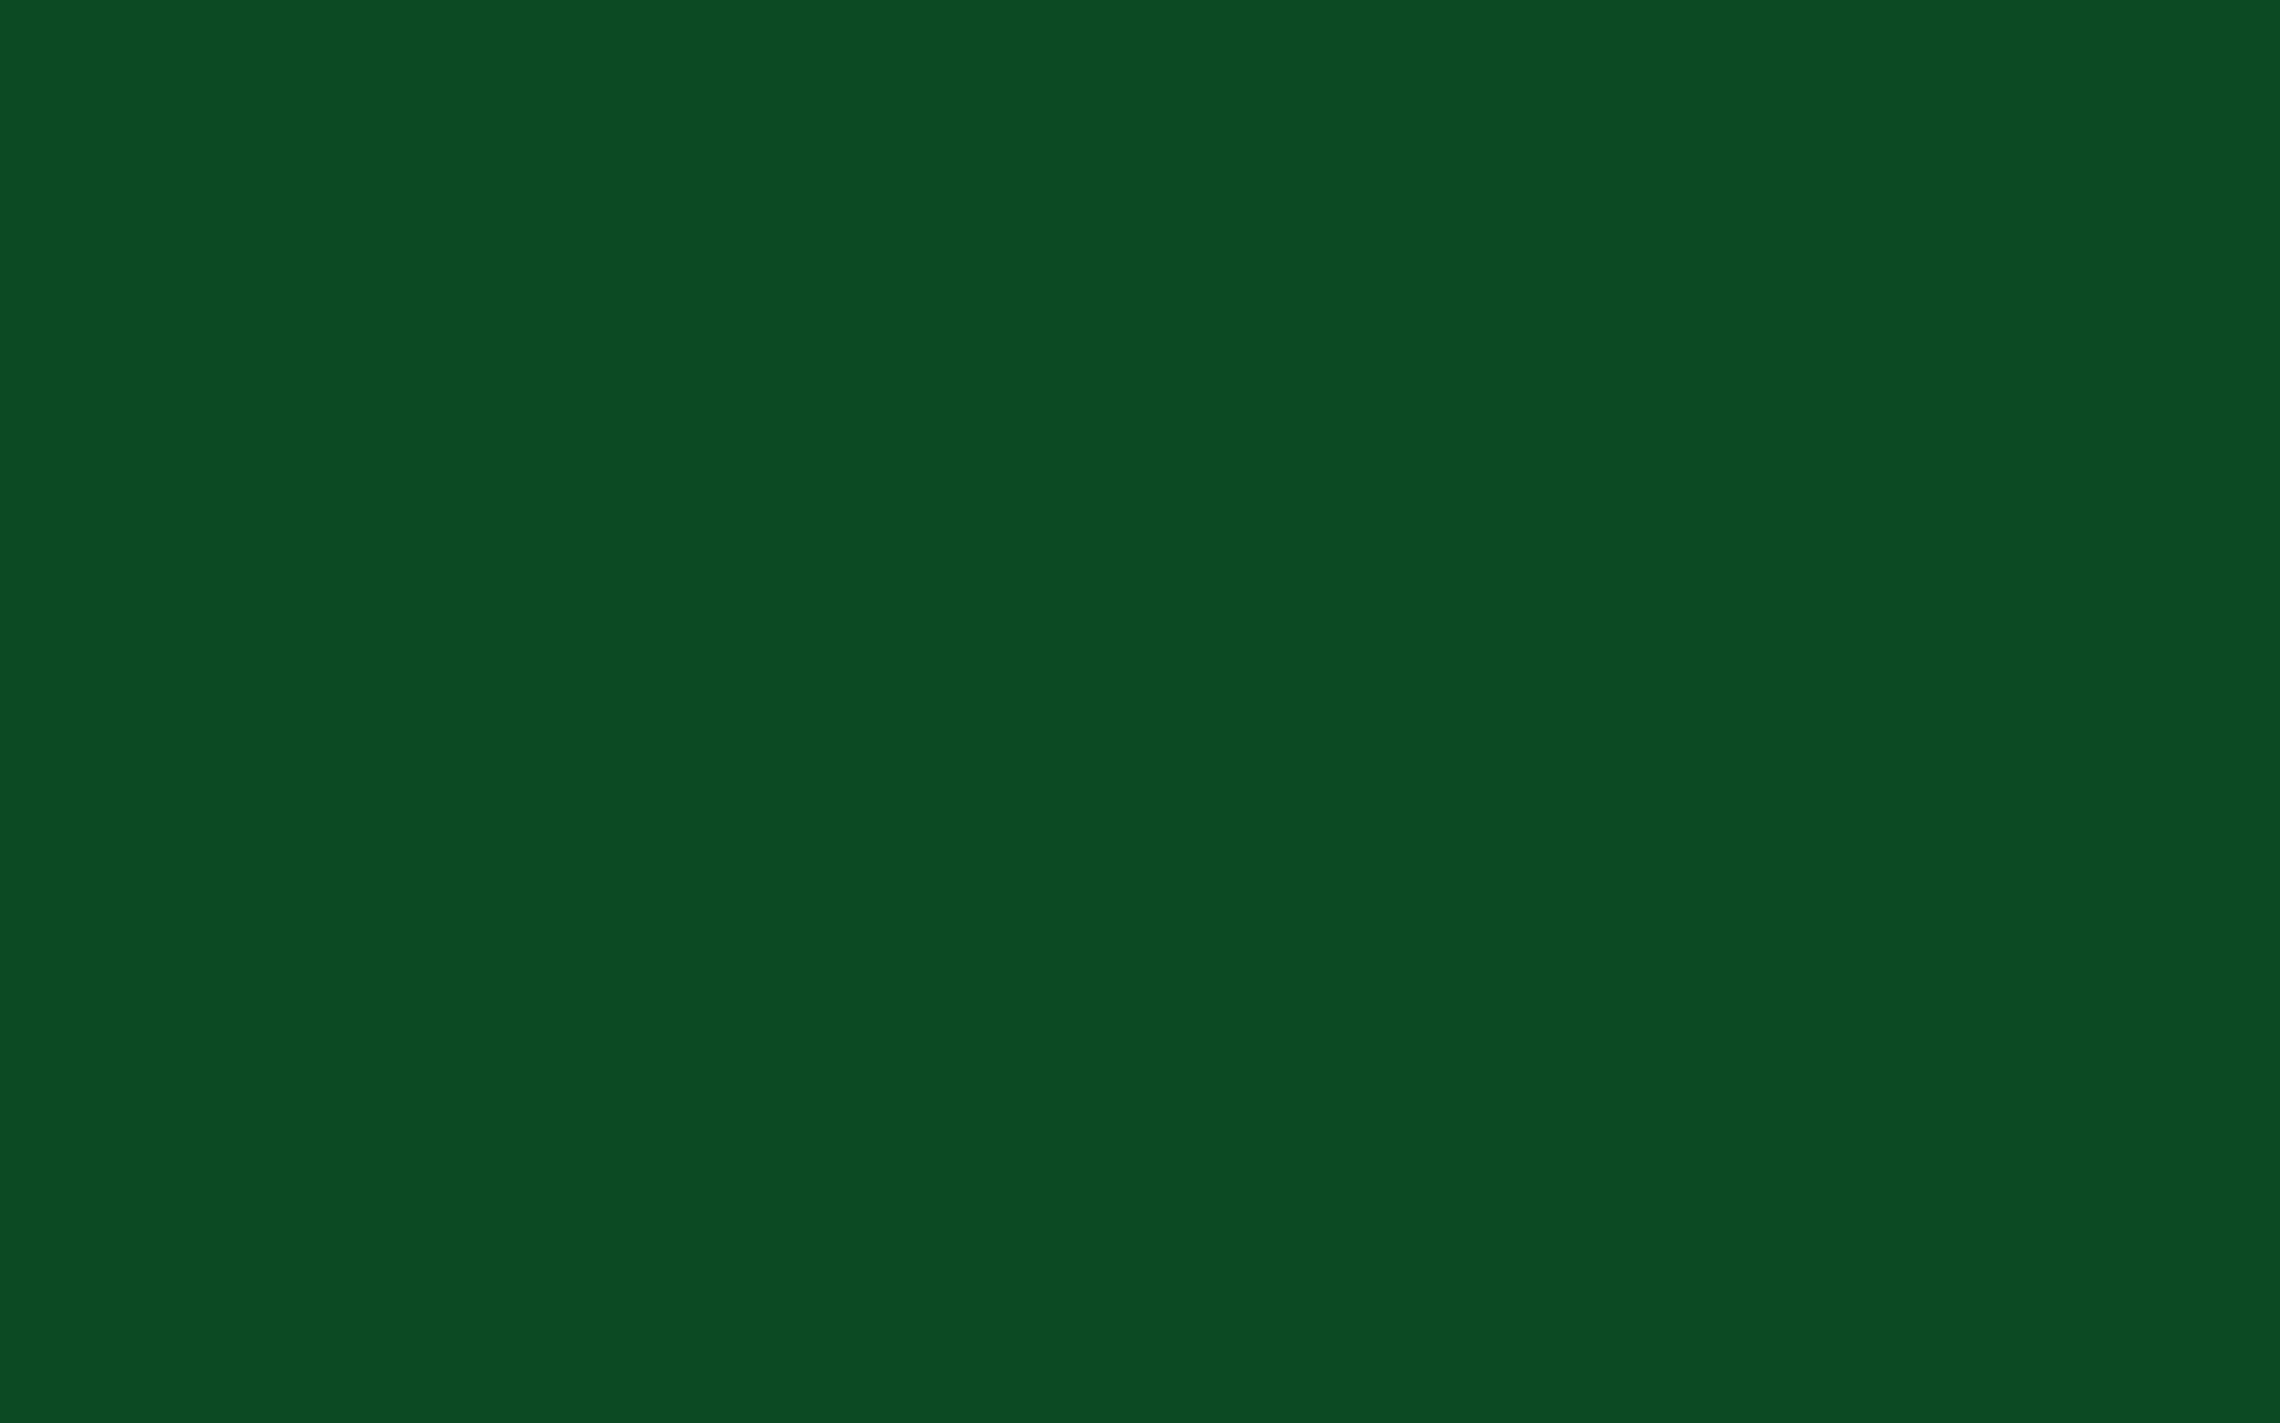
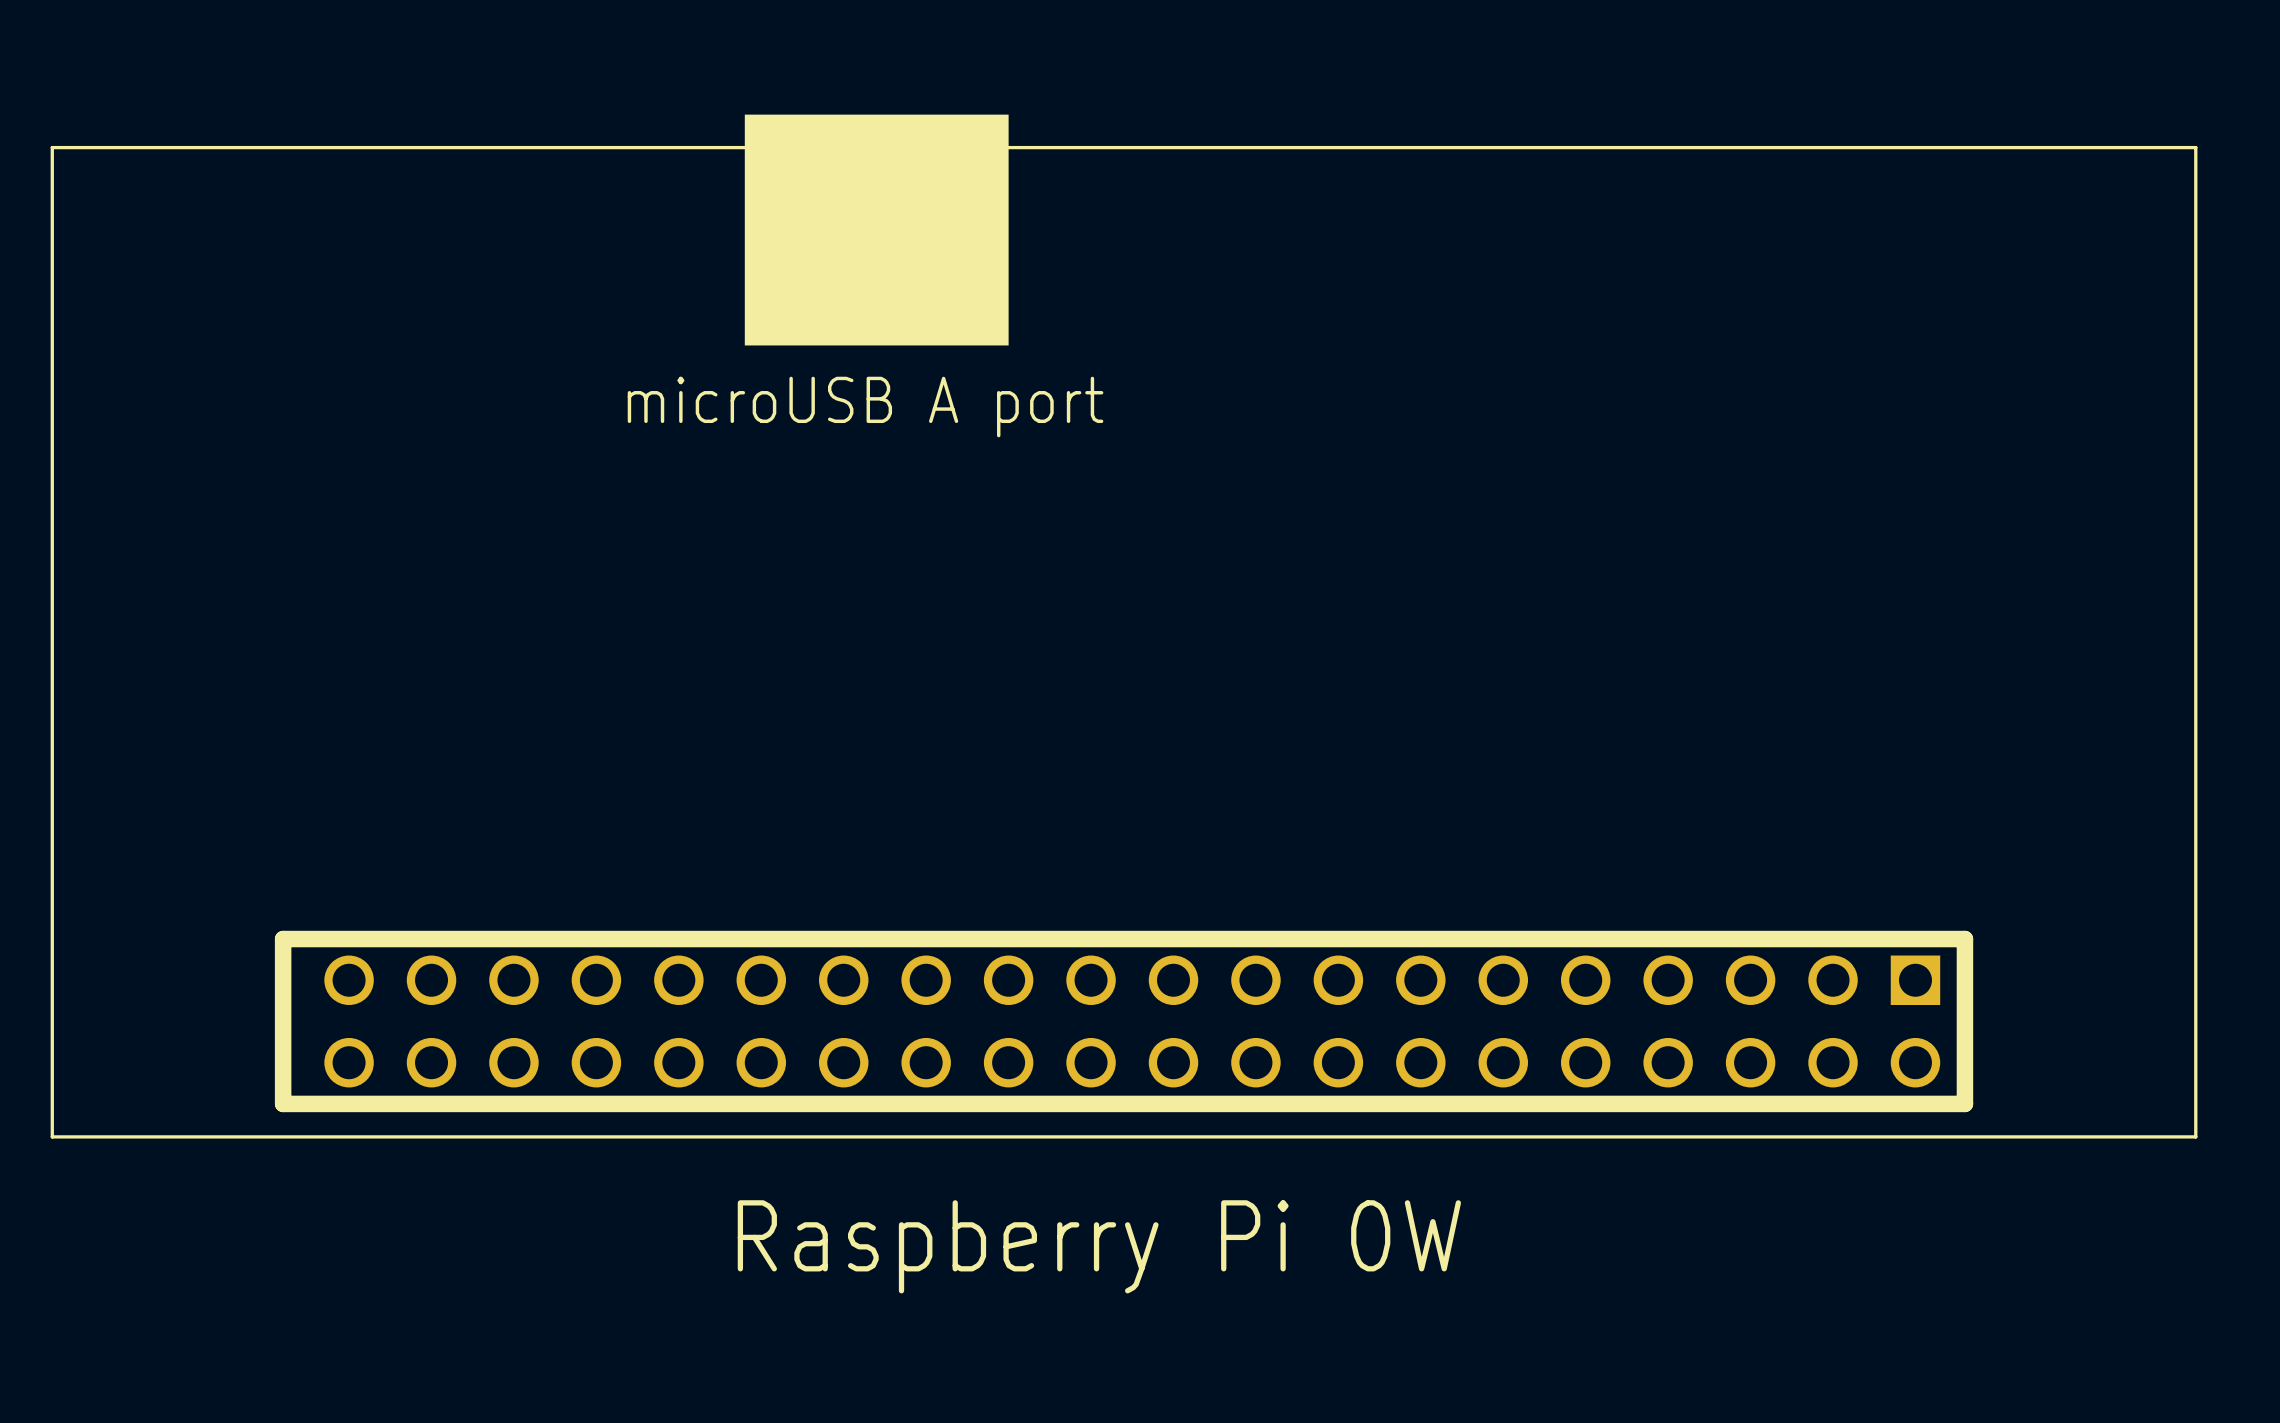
part: none -> (1124, 626)

